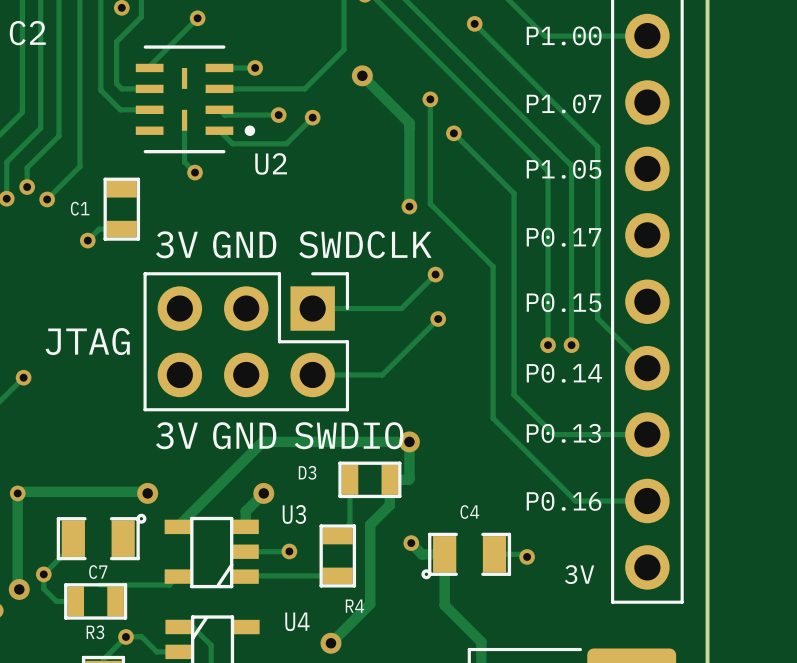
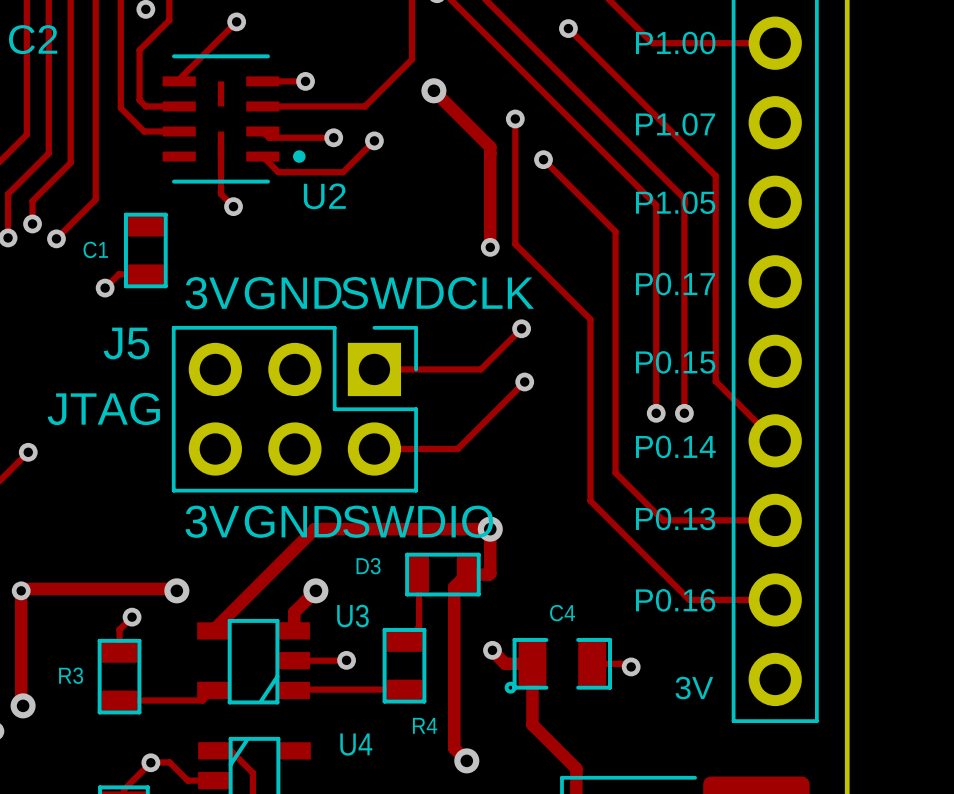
J5 name: none -> J5 (126, 343)
track: (389, 479) (389, 505) (370, 524) (370, 604) (330, 643) -> (466, 574) (454, 587) (454, 748) (466, 760)
track: none -> (132, 617) (119, 629) (119, 652)
C7: (101, 537) -> none
track: (73, 538) (73, 544) (43, 574) (43, 588) (56, 601) (75, 601) -> none
via position: (43, 574) -> (132, 617)
R3 rotation: 0° (95, 601) -> 90° clockwise (119, 676)
via position: (330, 643) -> (466, 760)

